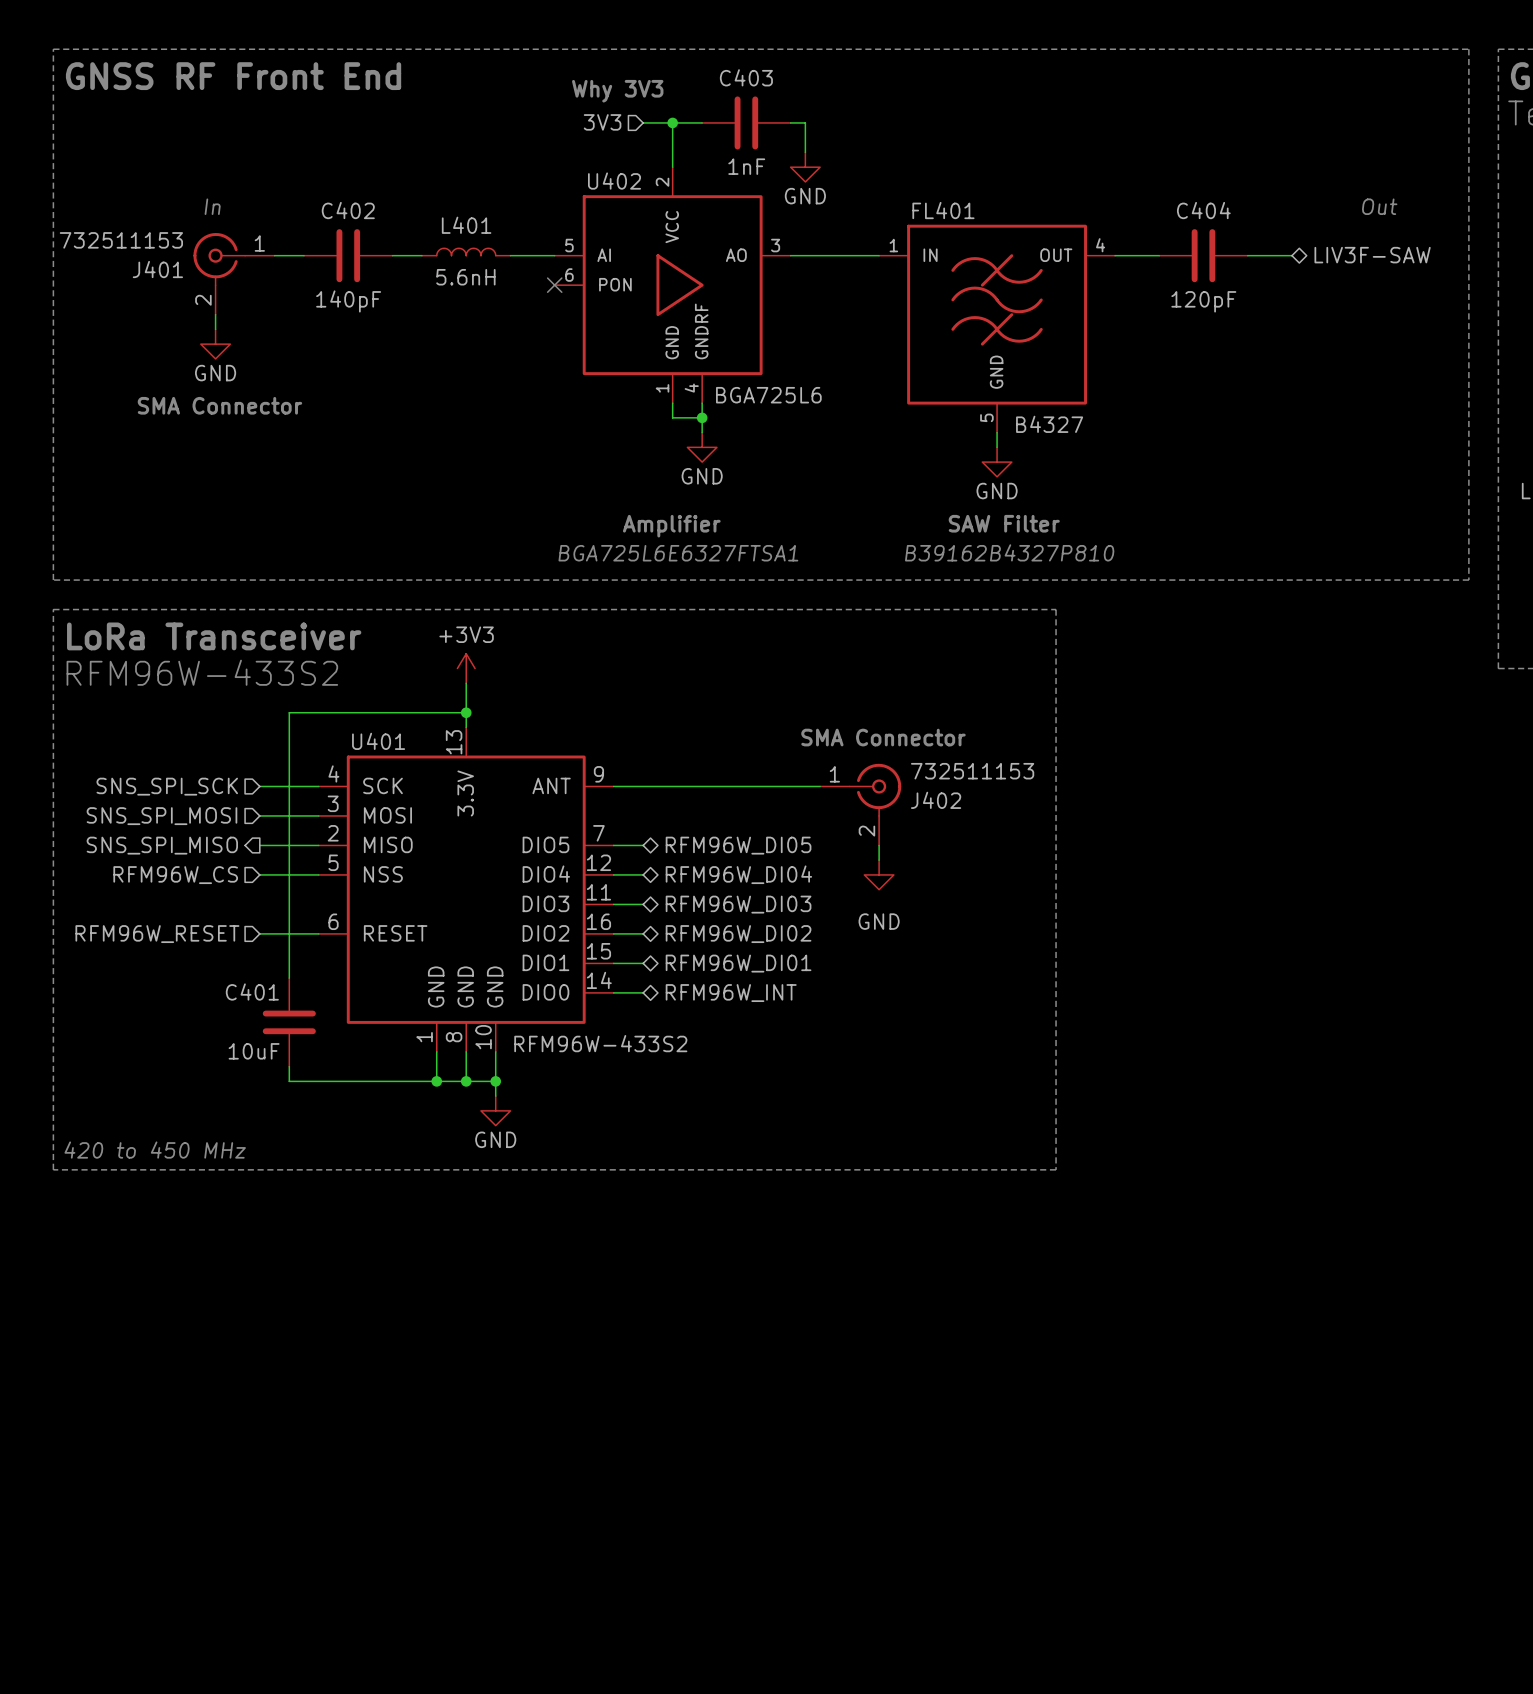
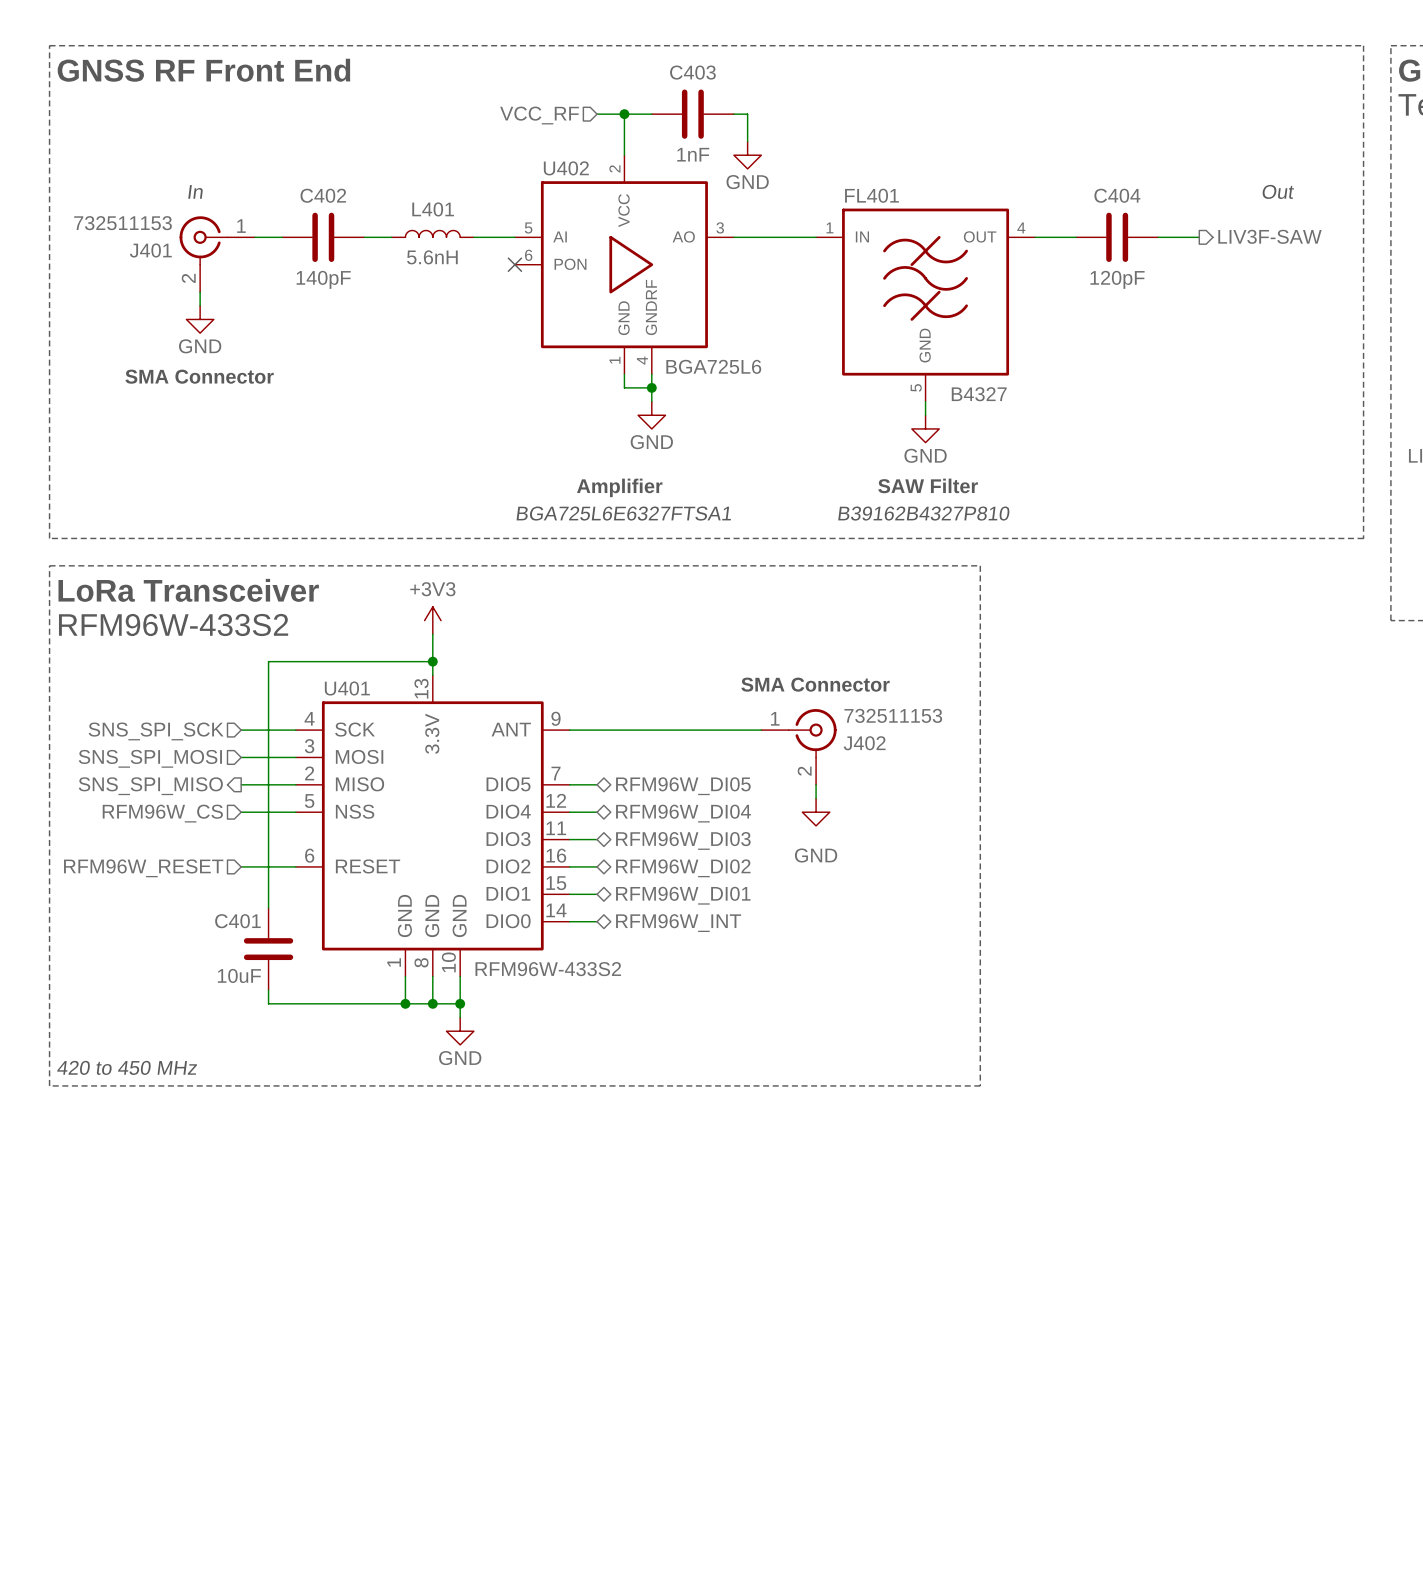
text: Why 3V3 (617, 91) -> none
hierarchical label: 3V3 (602, 122) -> VCC_RF (539, 115)
hierarchical label shape: bidirectional (1372, 255) -> output (1269, 236)

